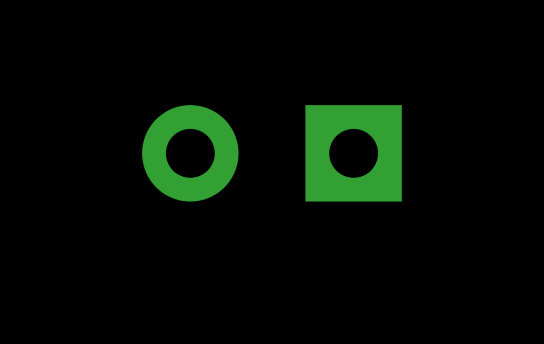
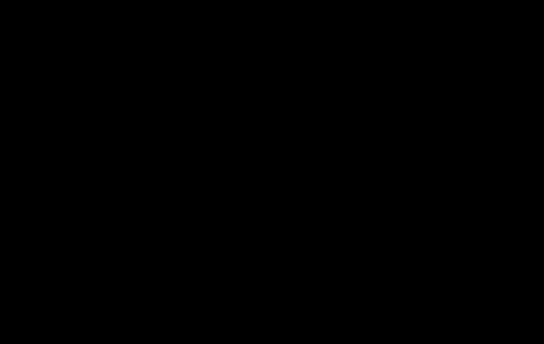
part: (271, 153) -> none

